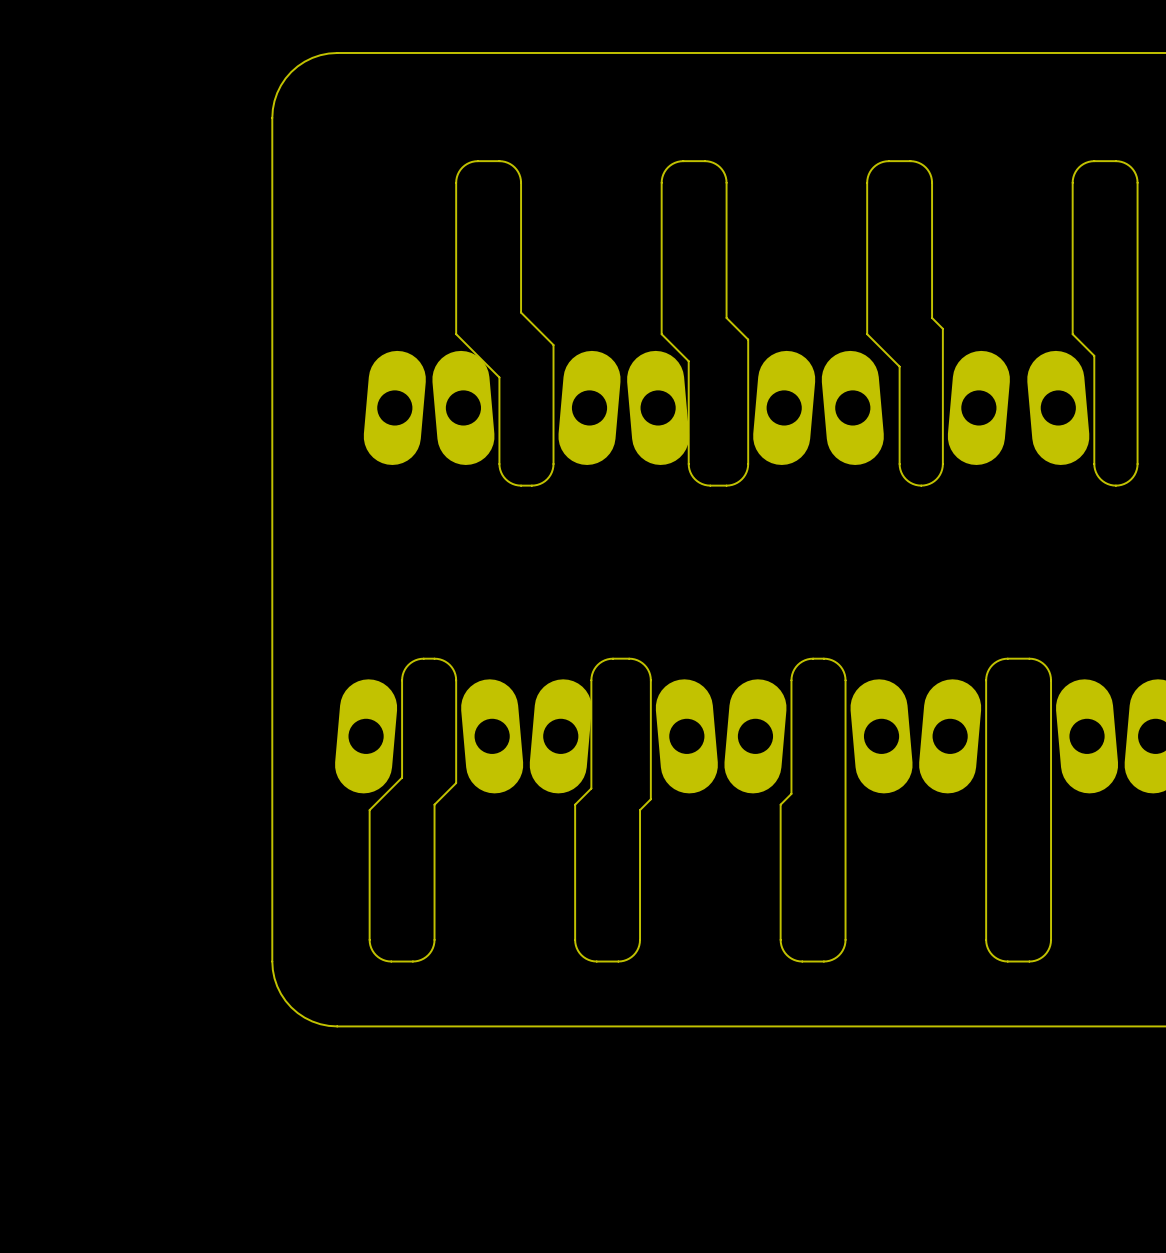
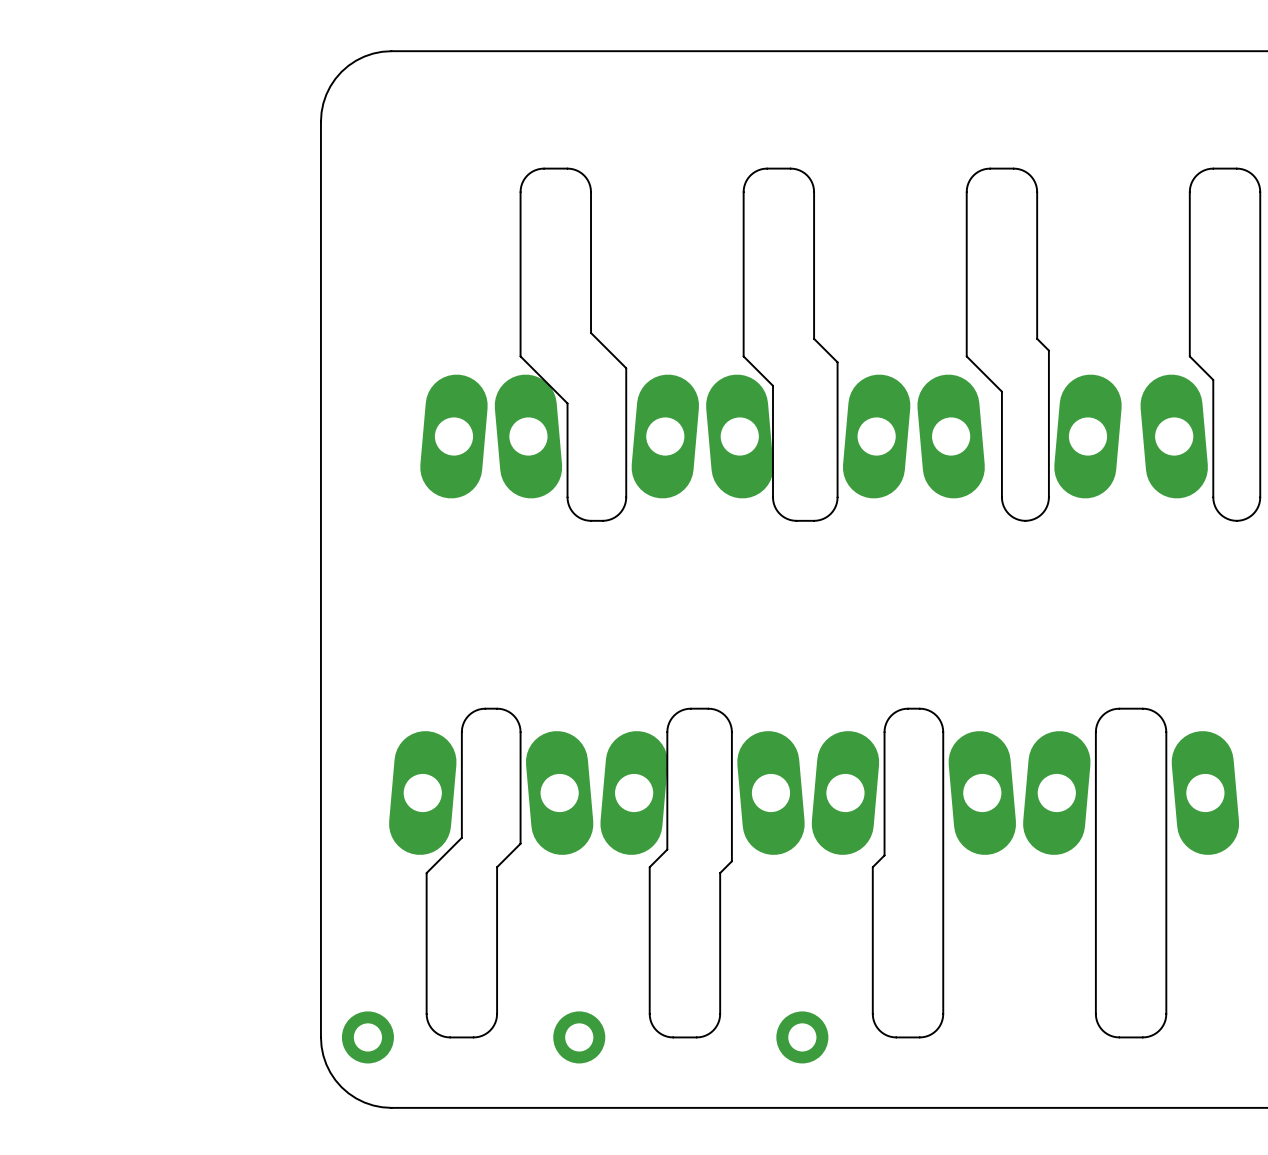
part: none -> (367, 1037)
part: none -> (579, 1037)
part: none -> (802, 1037)

